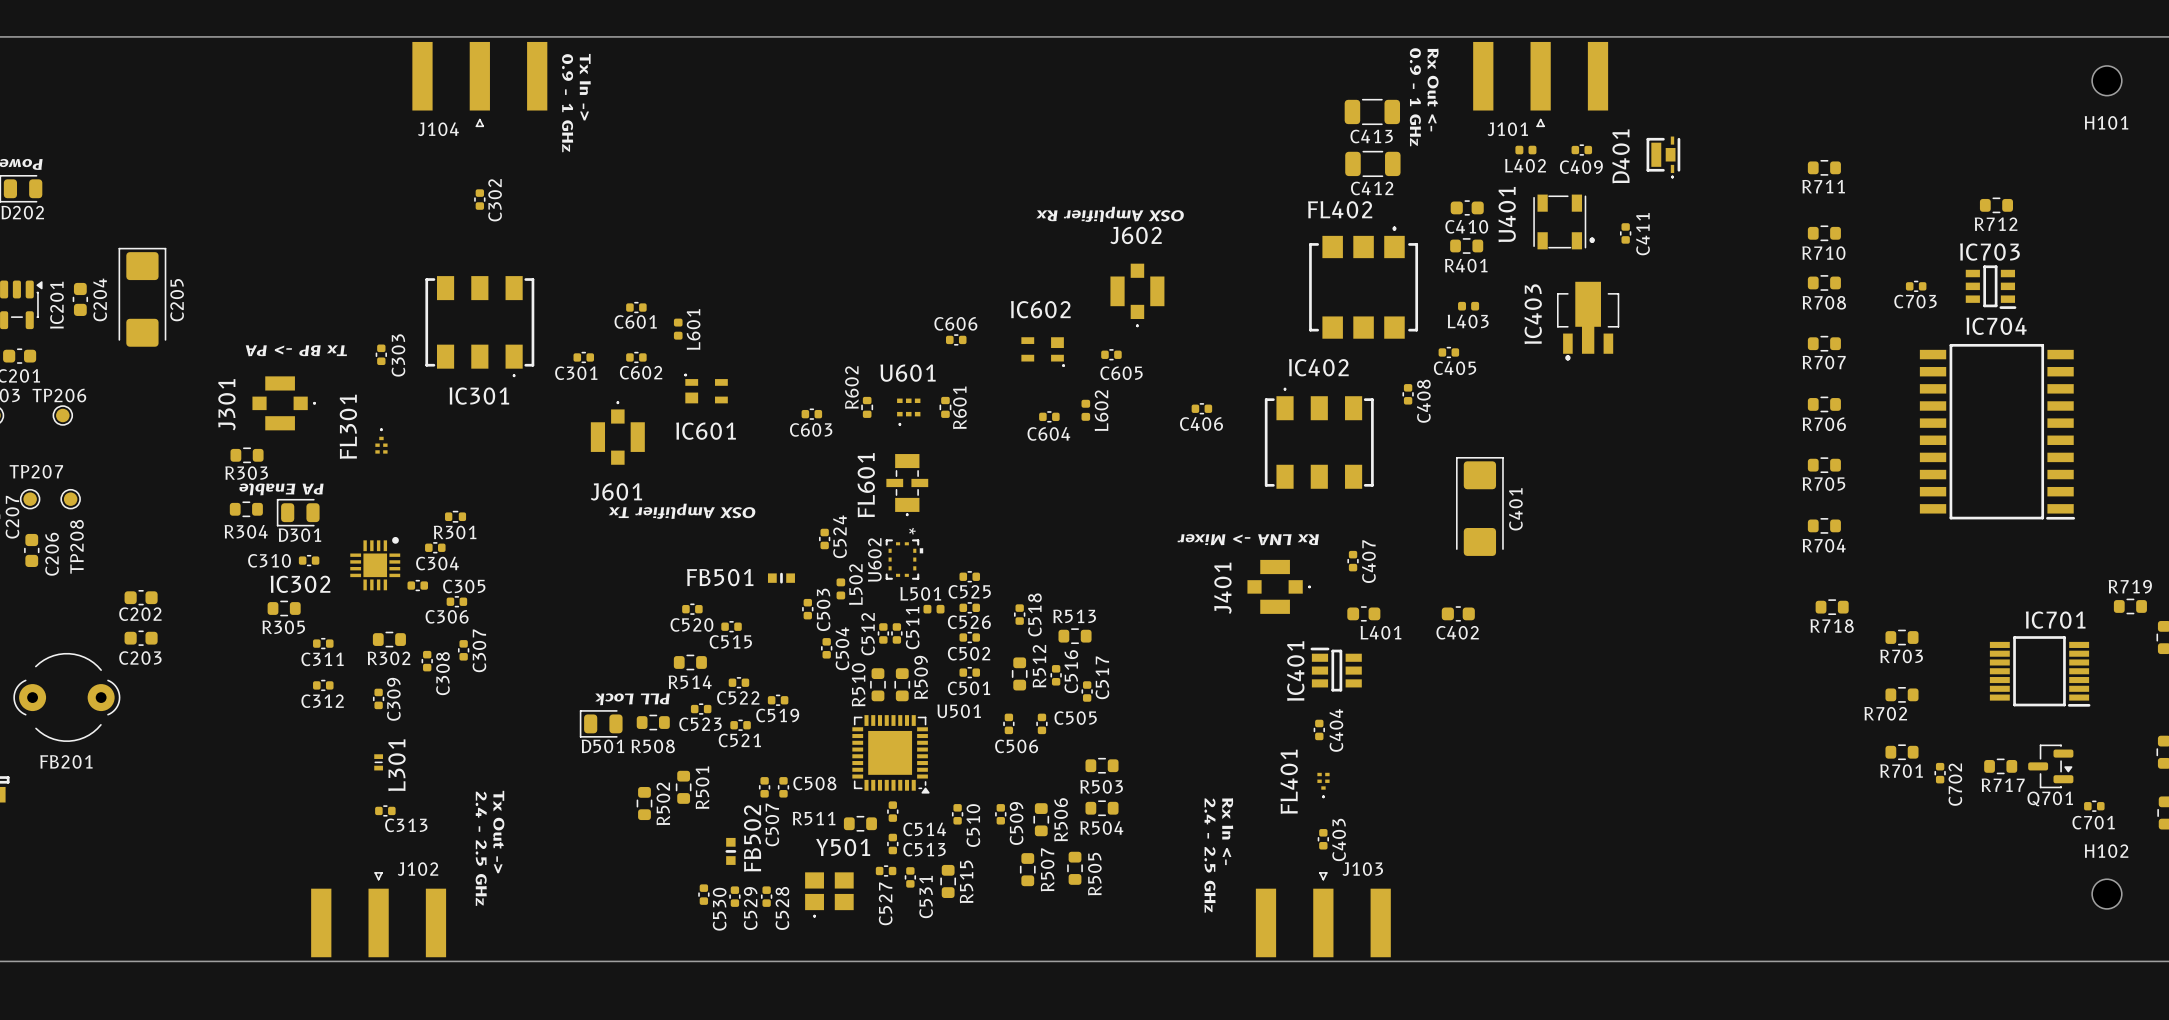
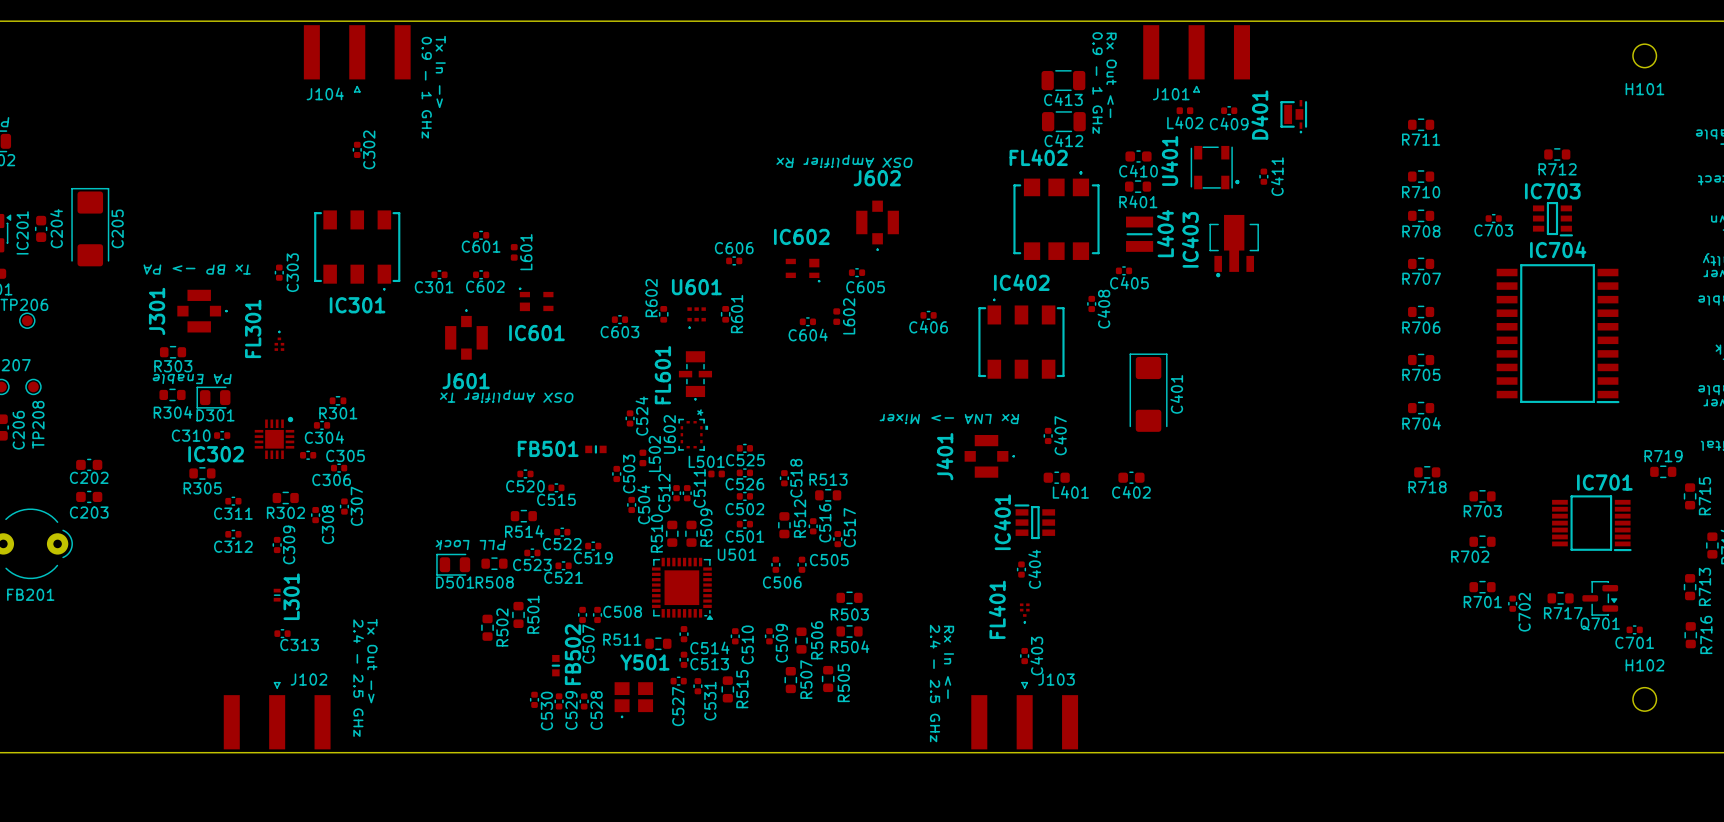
L403: (1468, 306) -> none
L404: none -> (1139, 234)

